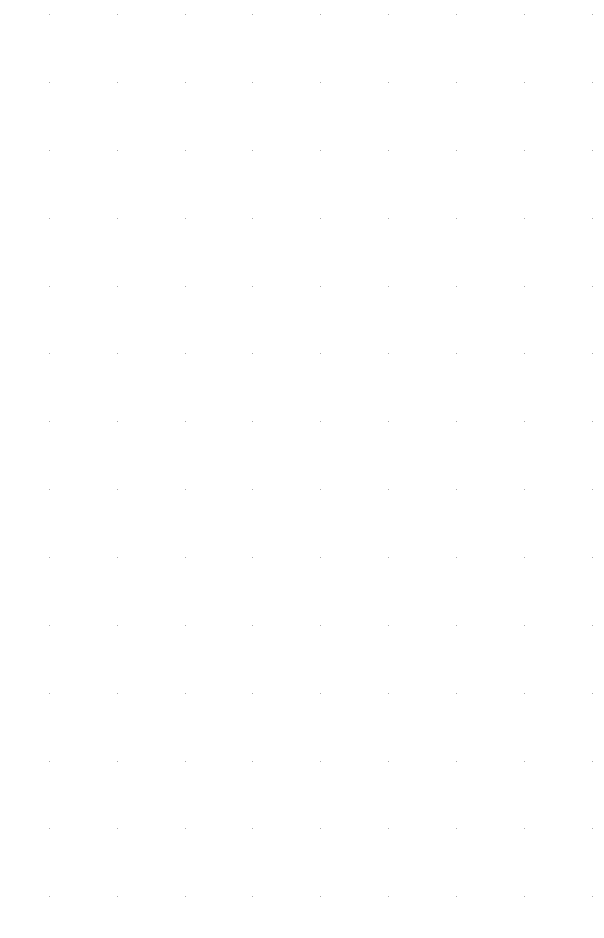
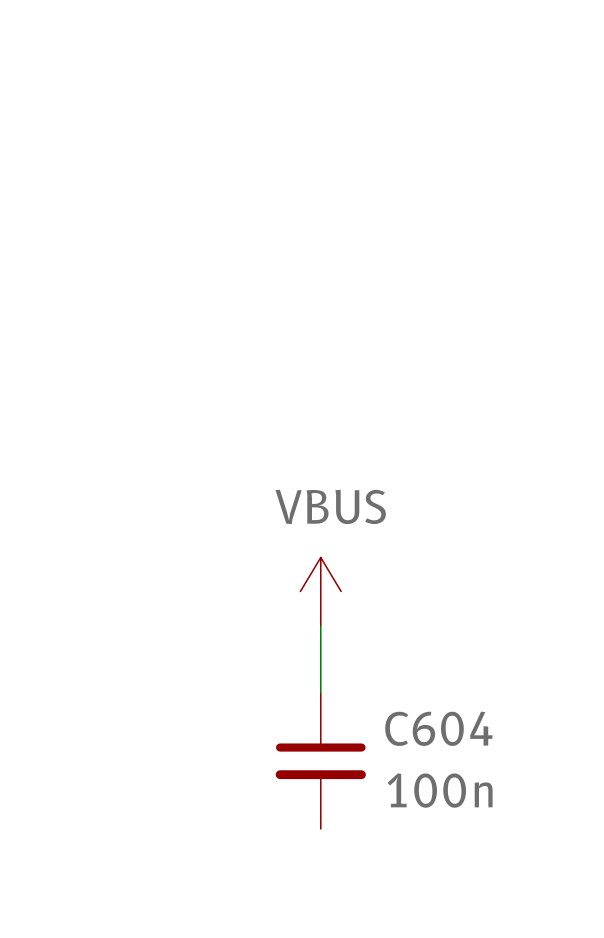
power symbol: none -> VBUS (320, 591)
wire: none -> (320, 625) (320, 693)
C604: none -> 100n (320, 761)

